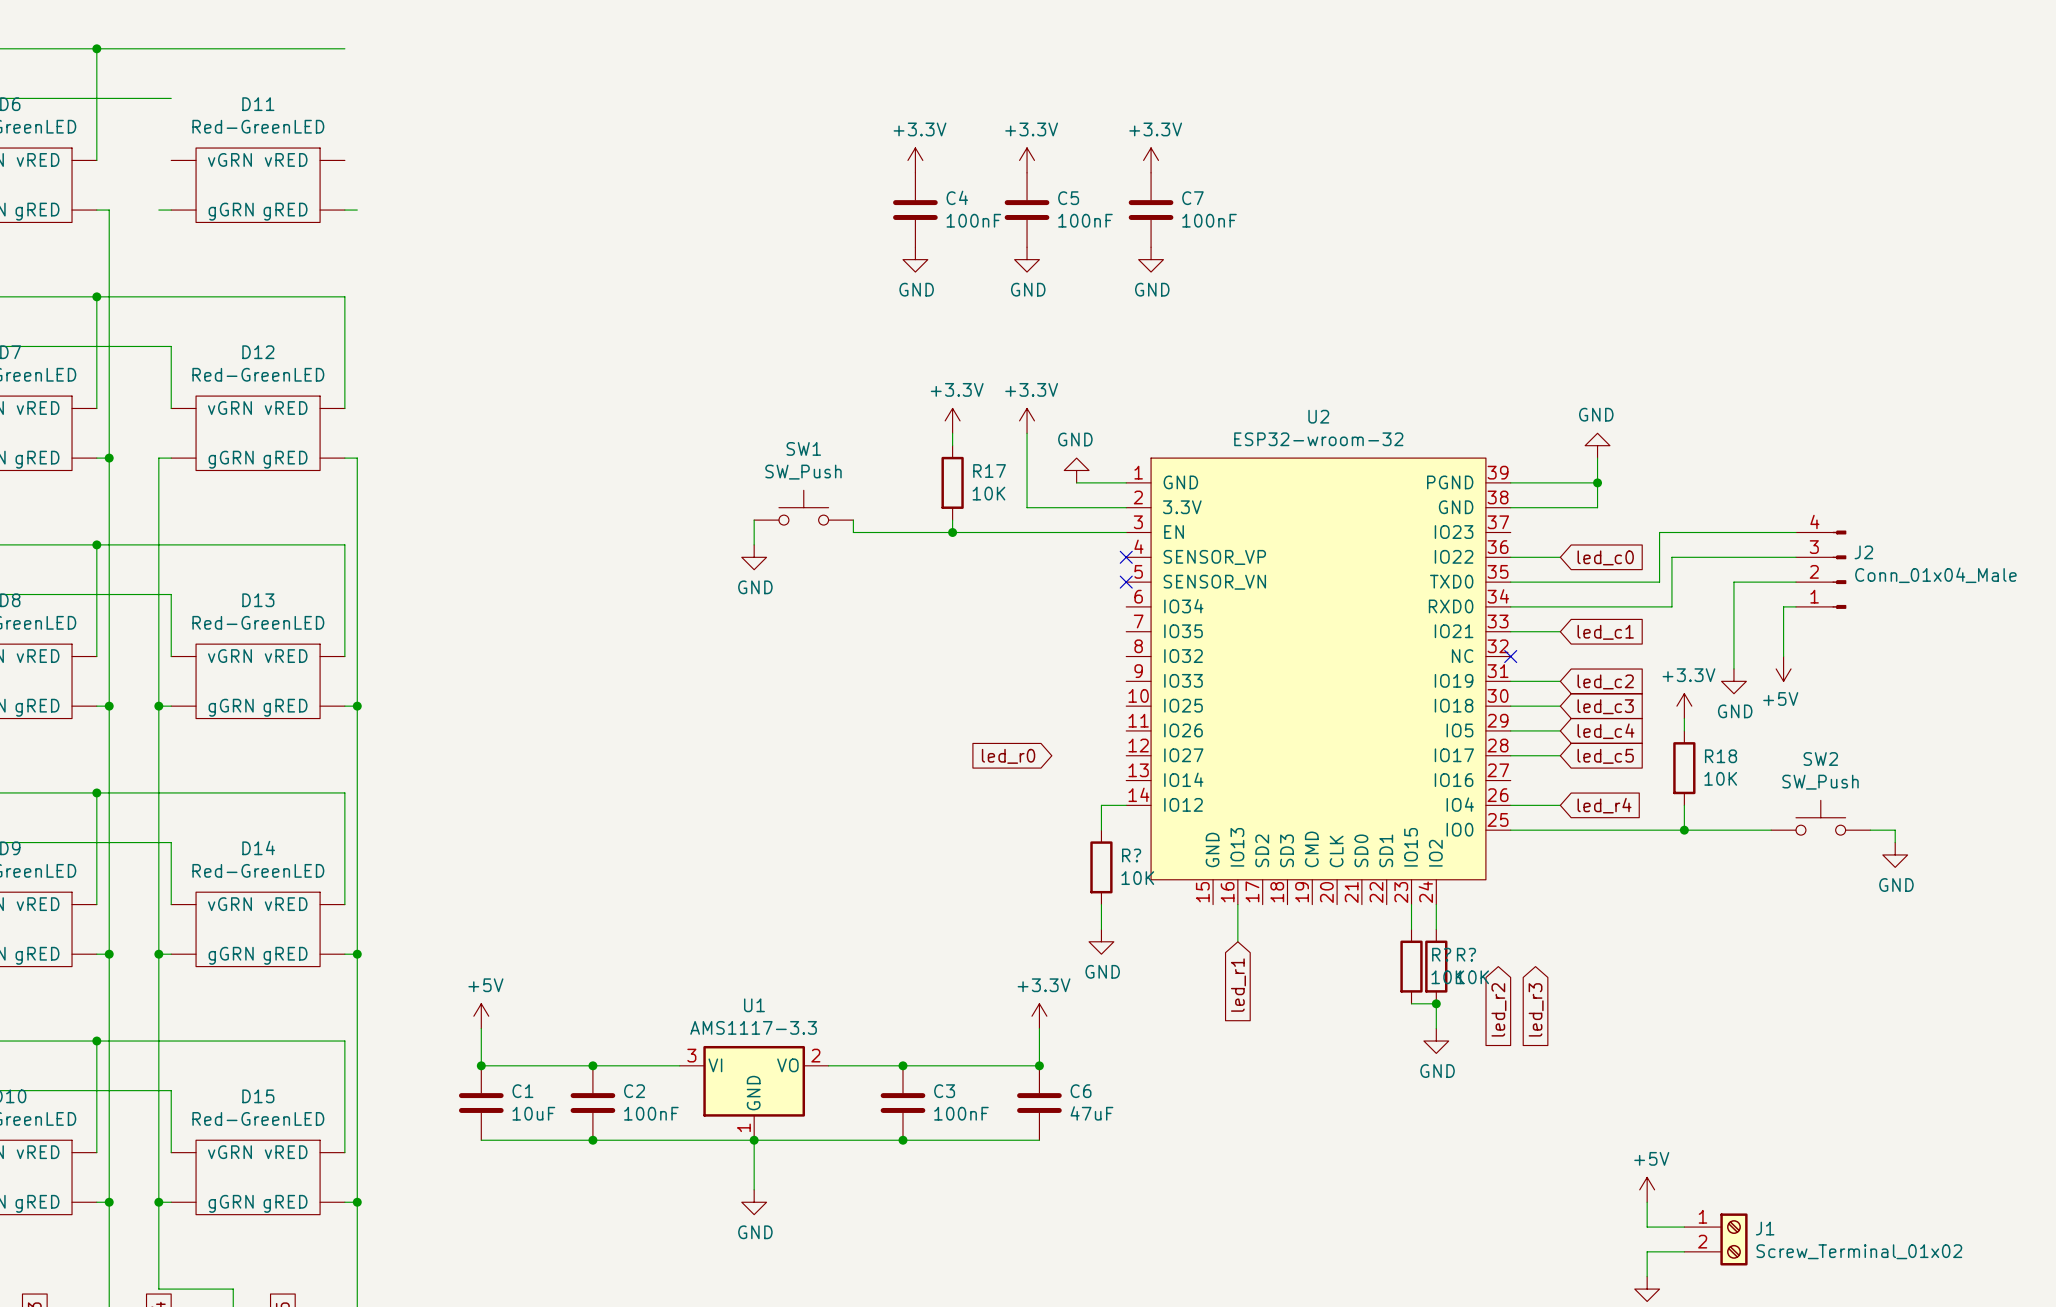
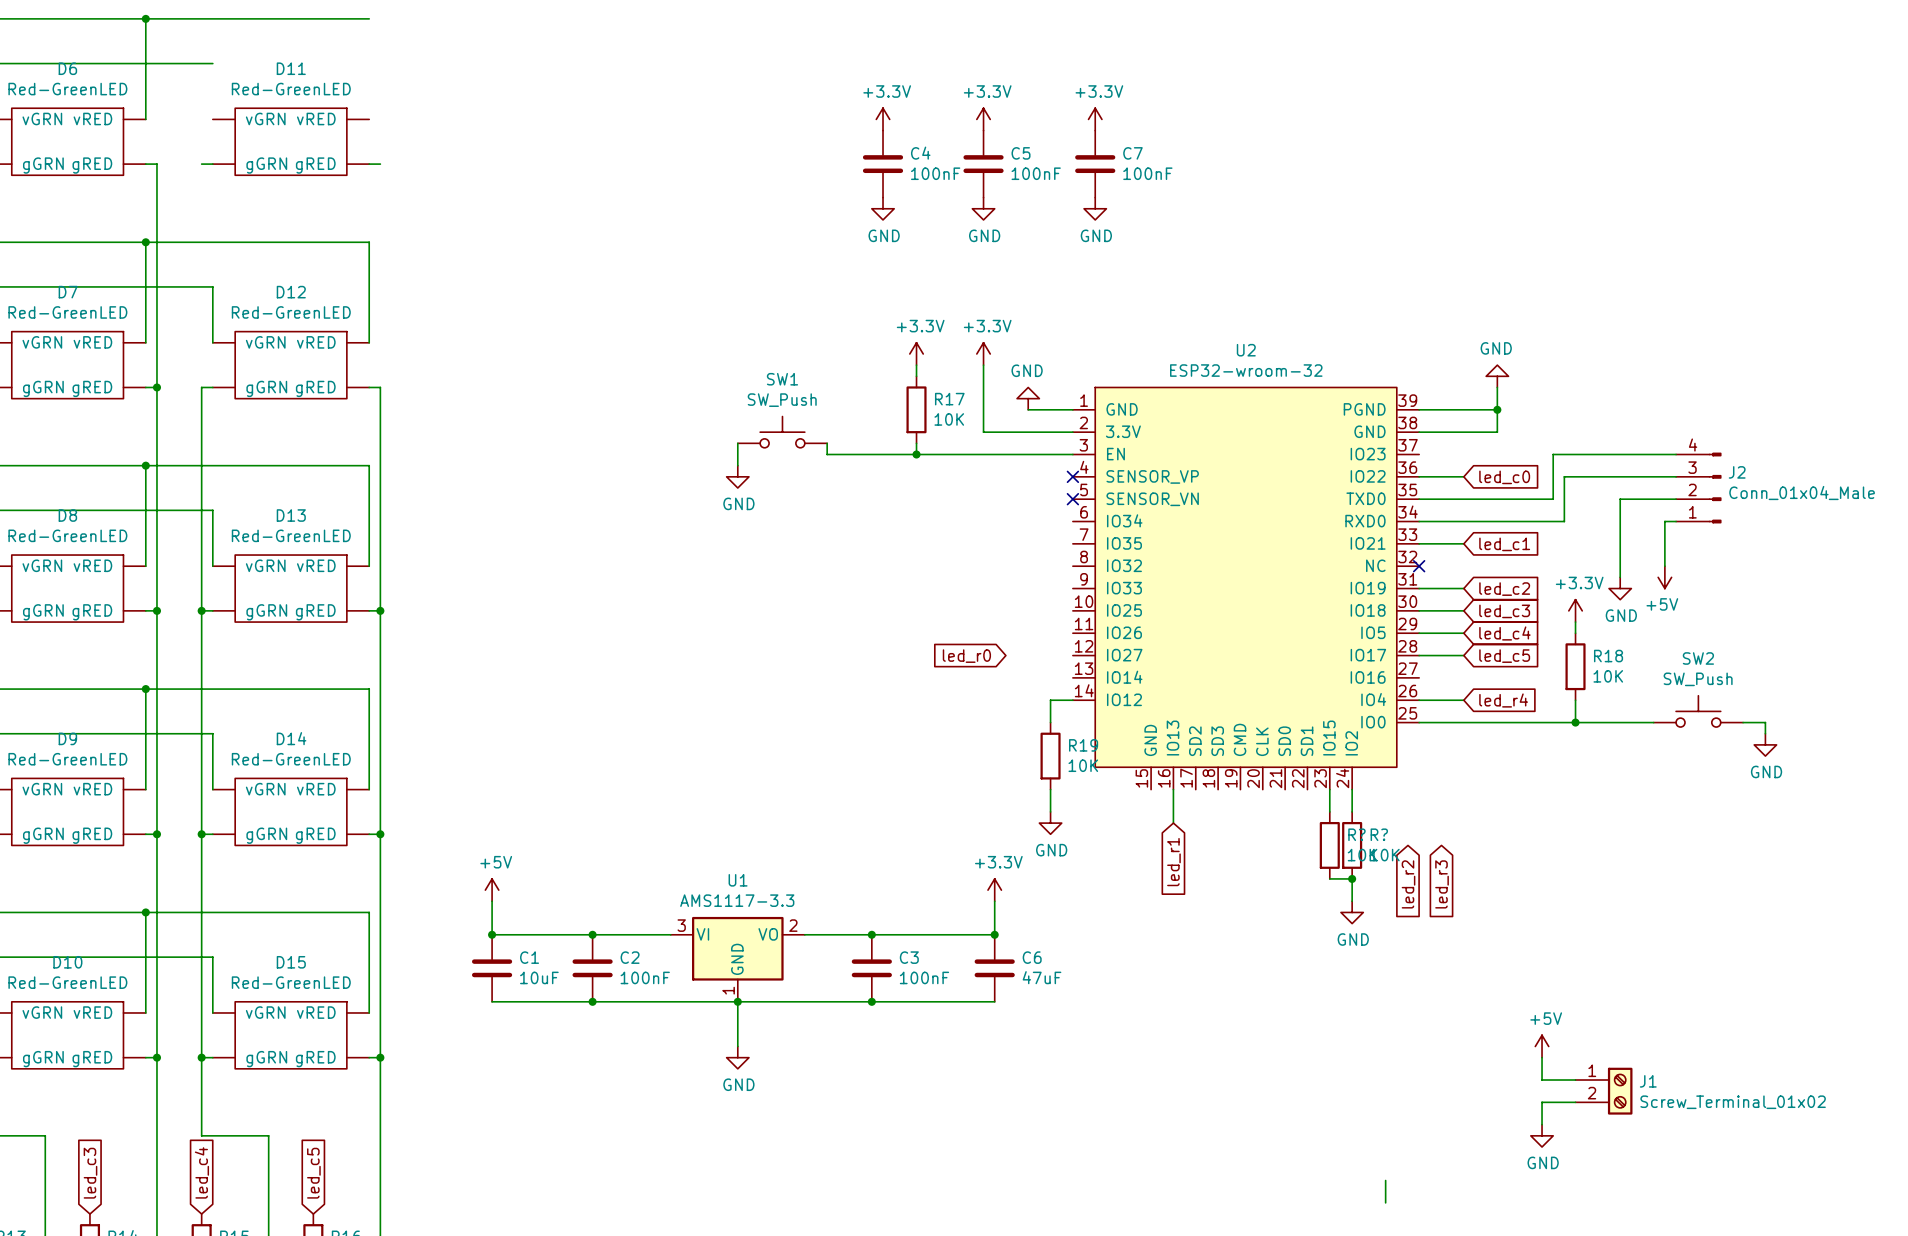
R? name: R? (1131, 855) -> R19 (1083, 745)

